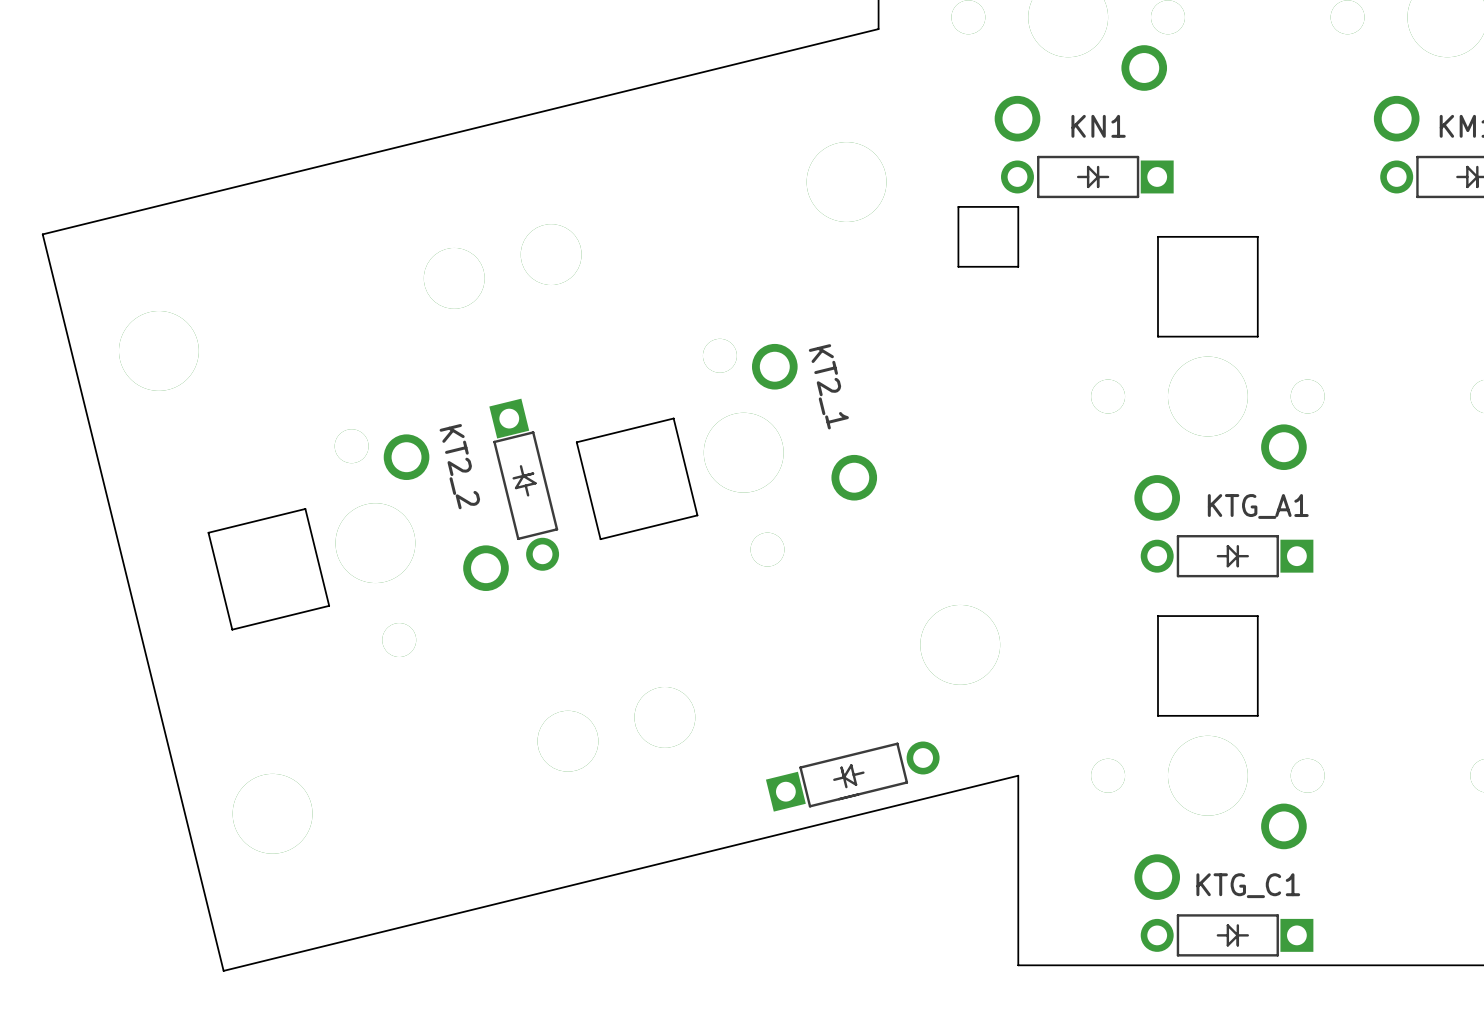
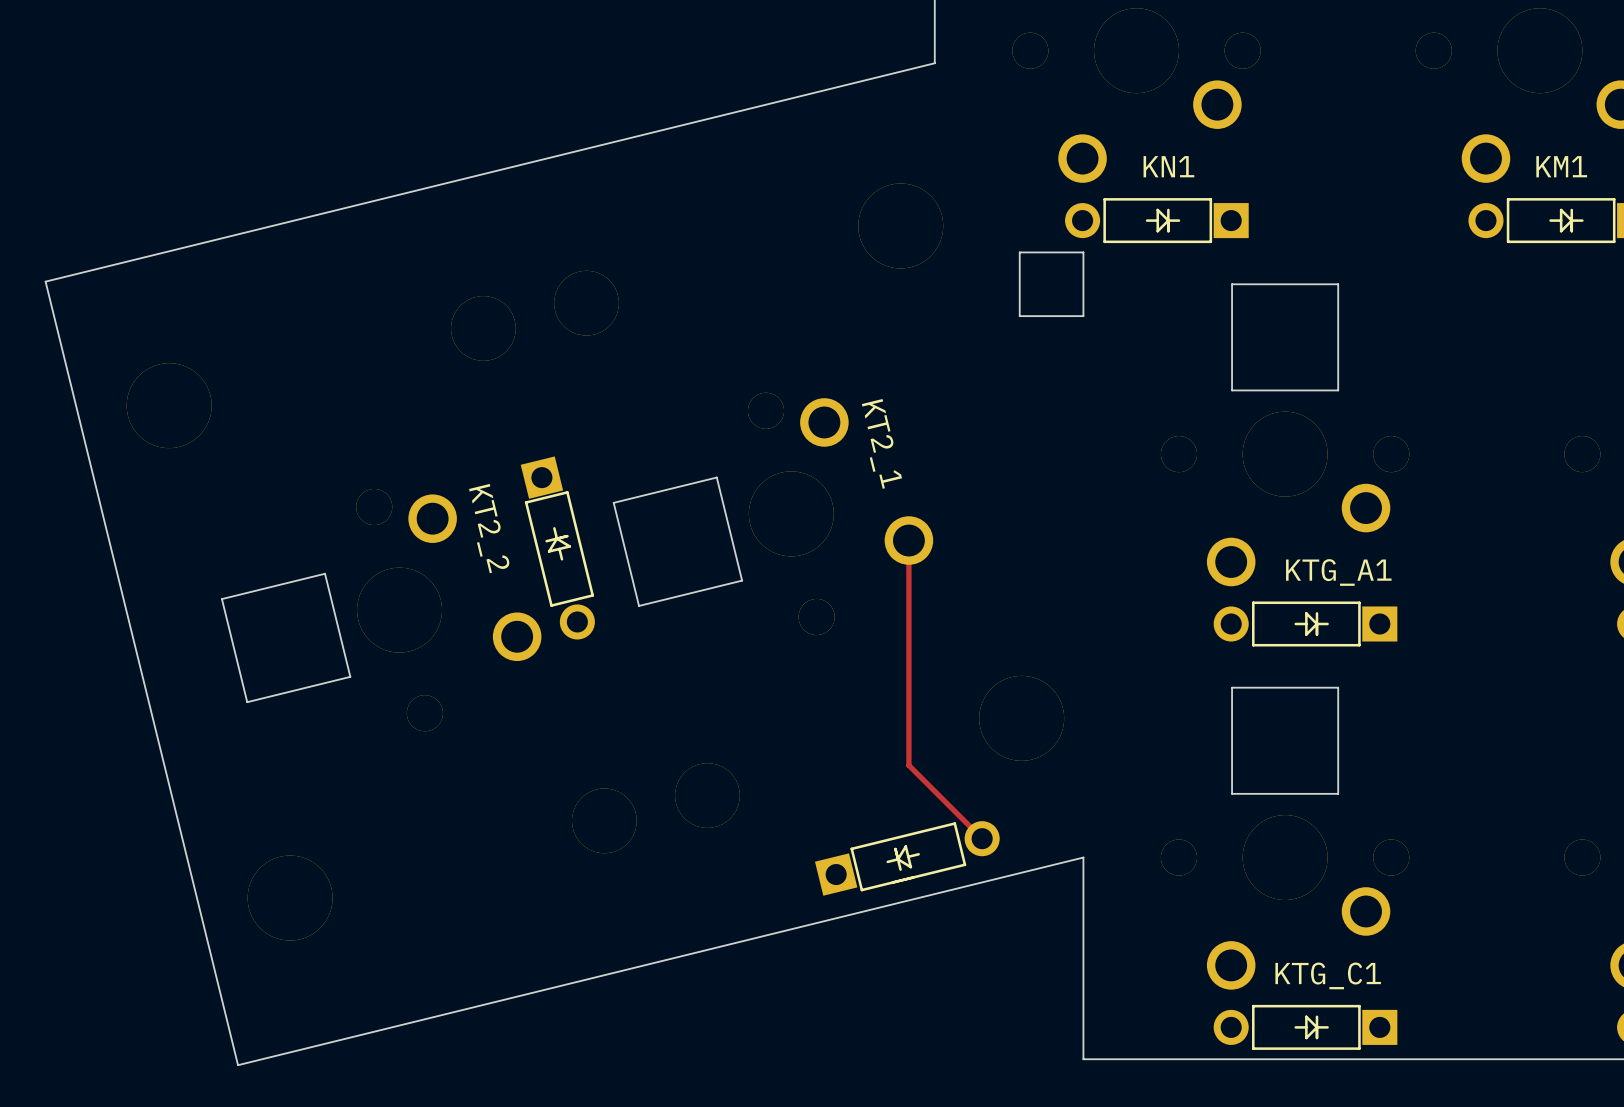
track: none -> (908, 540) (908, 765) (982, 838)

